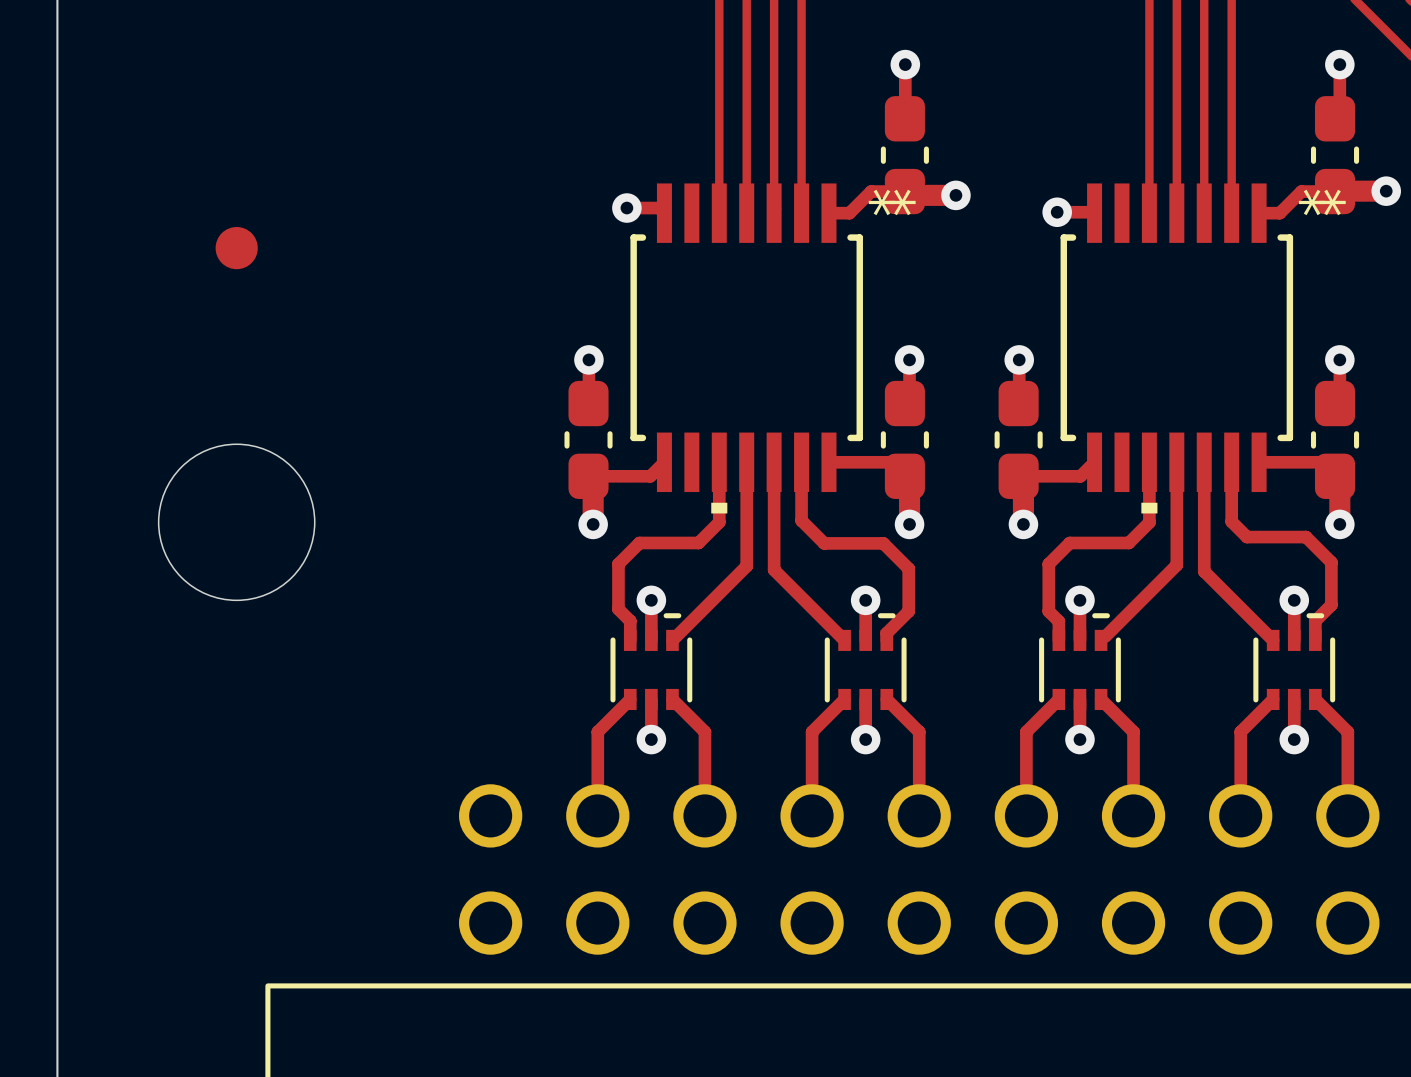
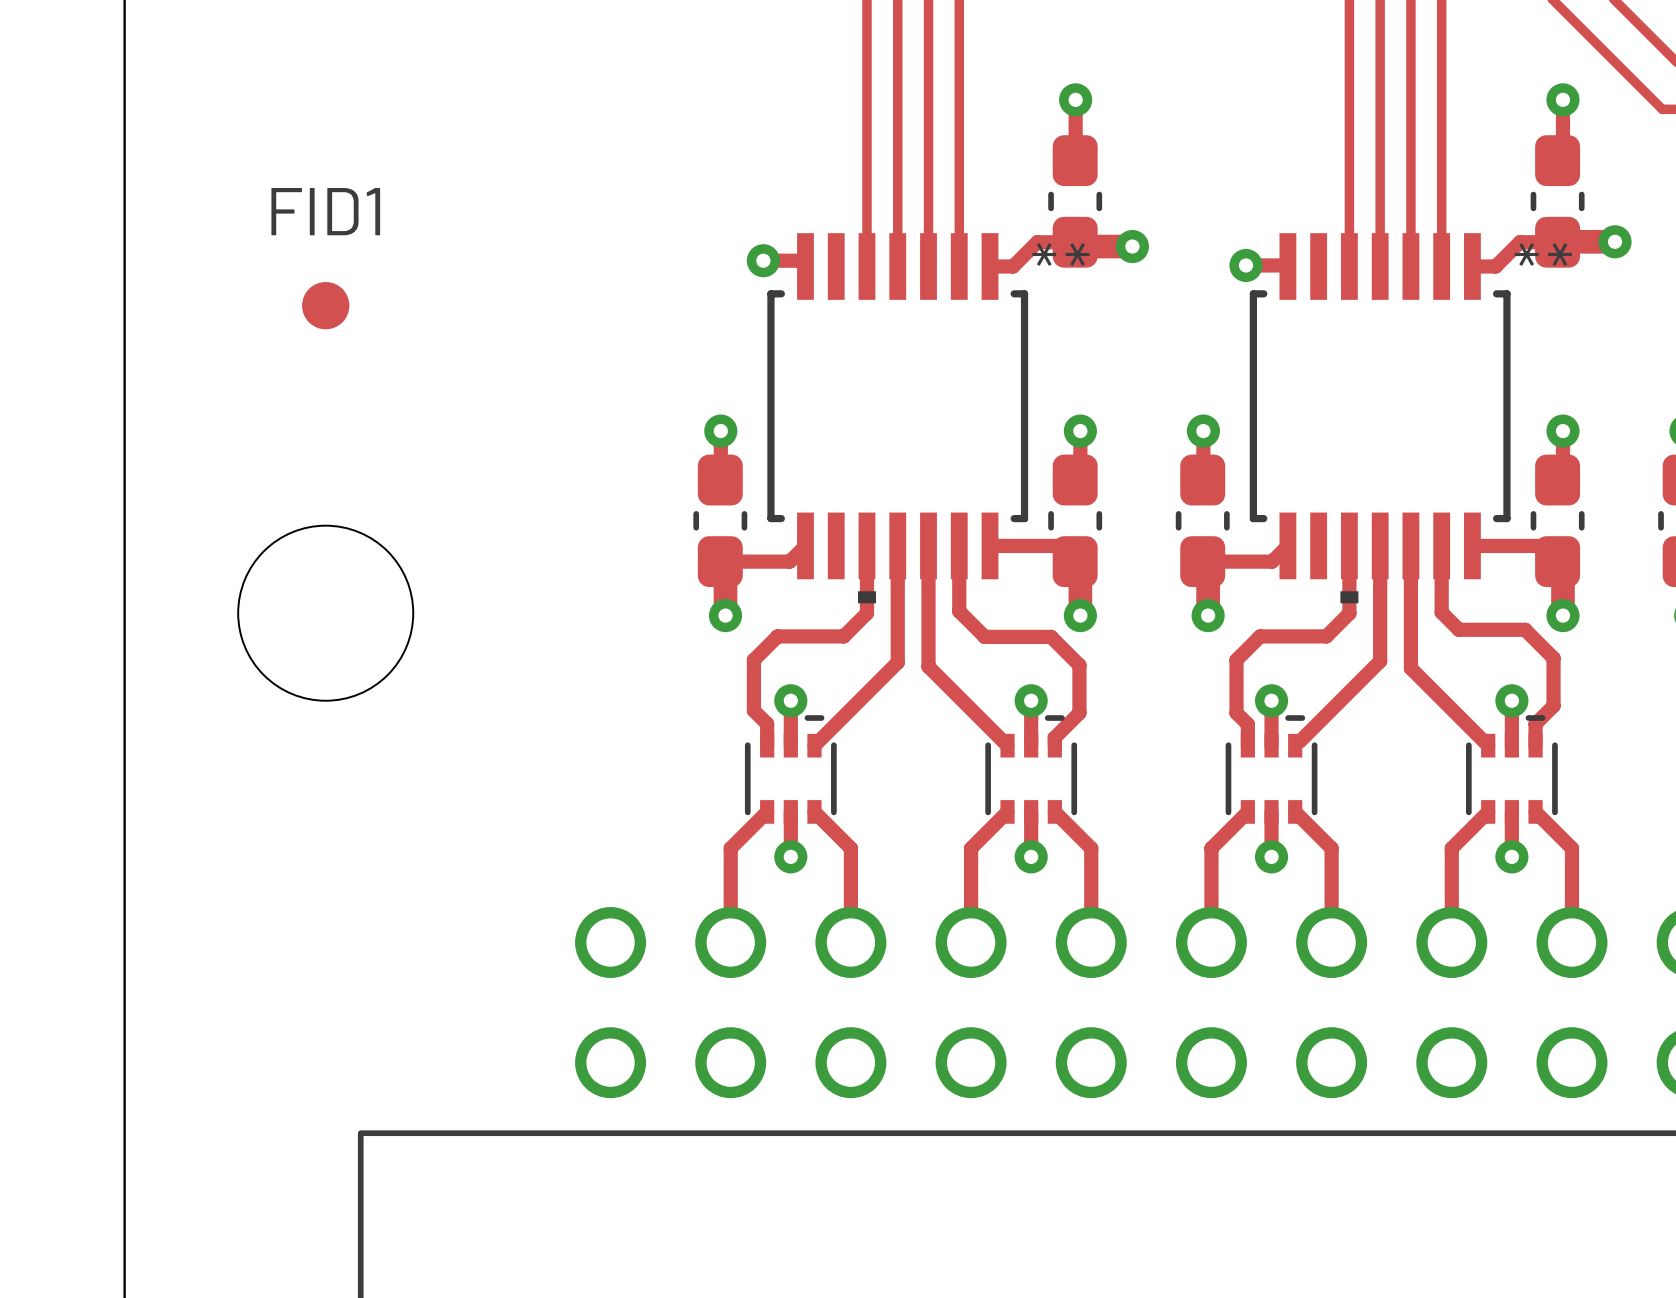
FID1 name: none -> FID1 (325, 211)

